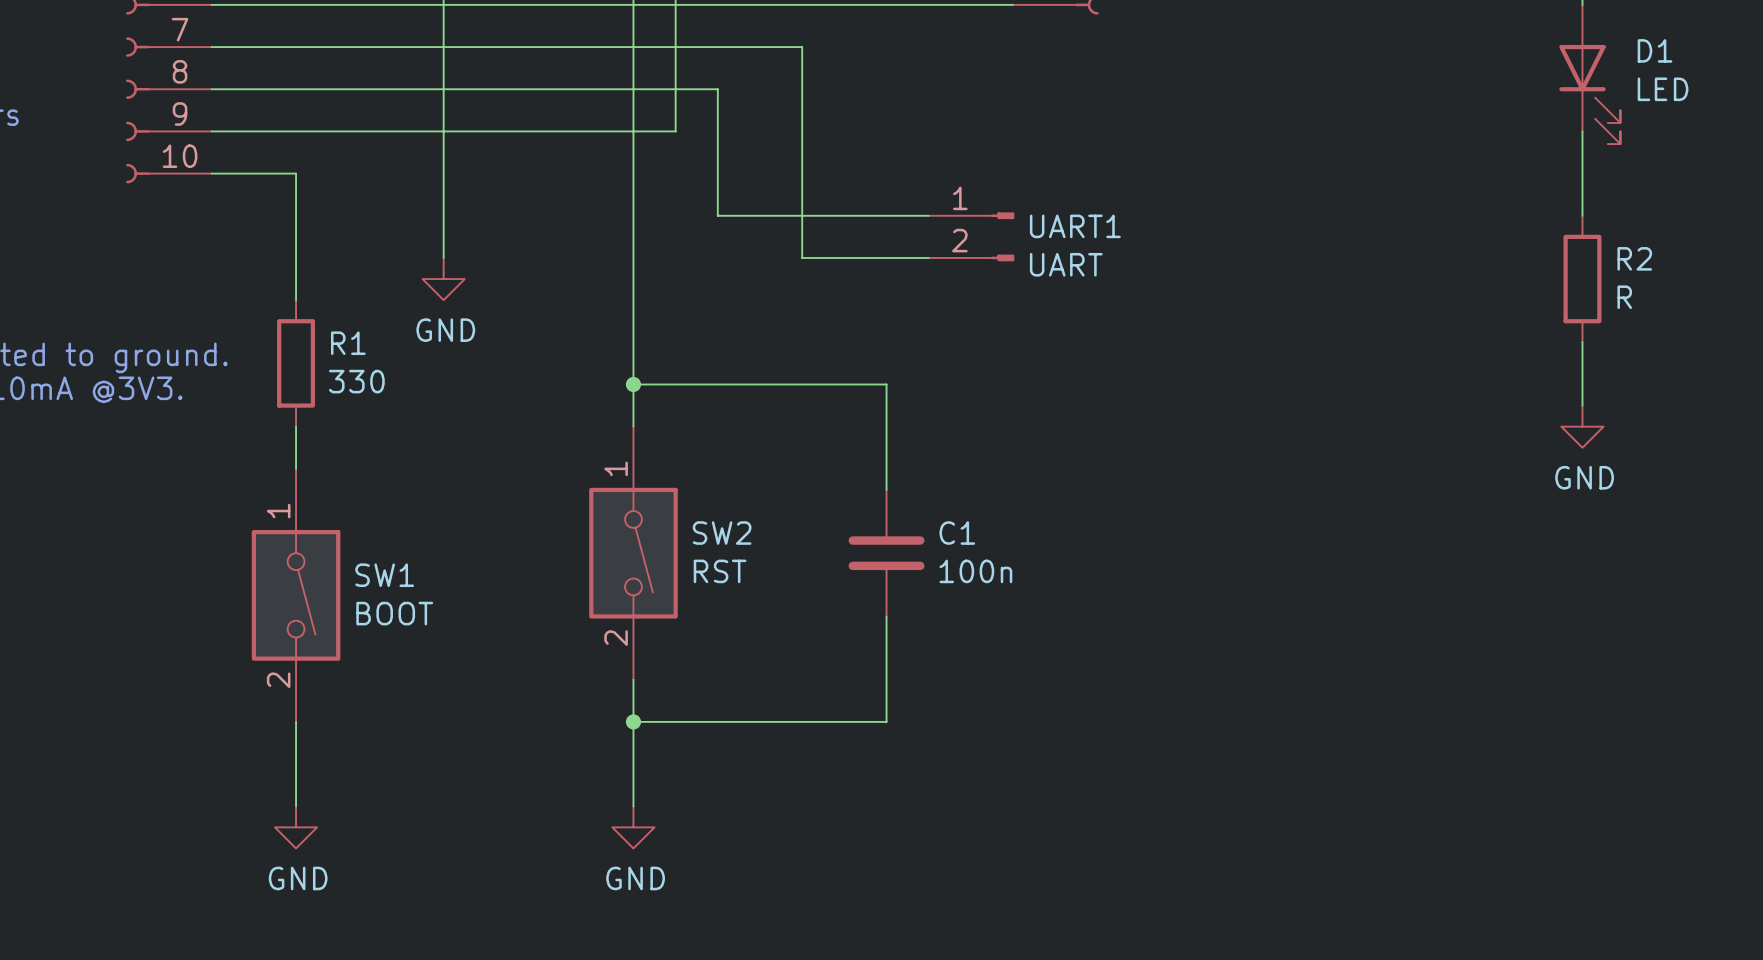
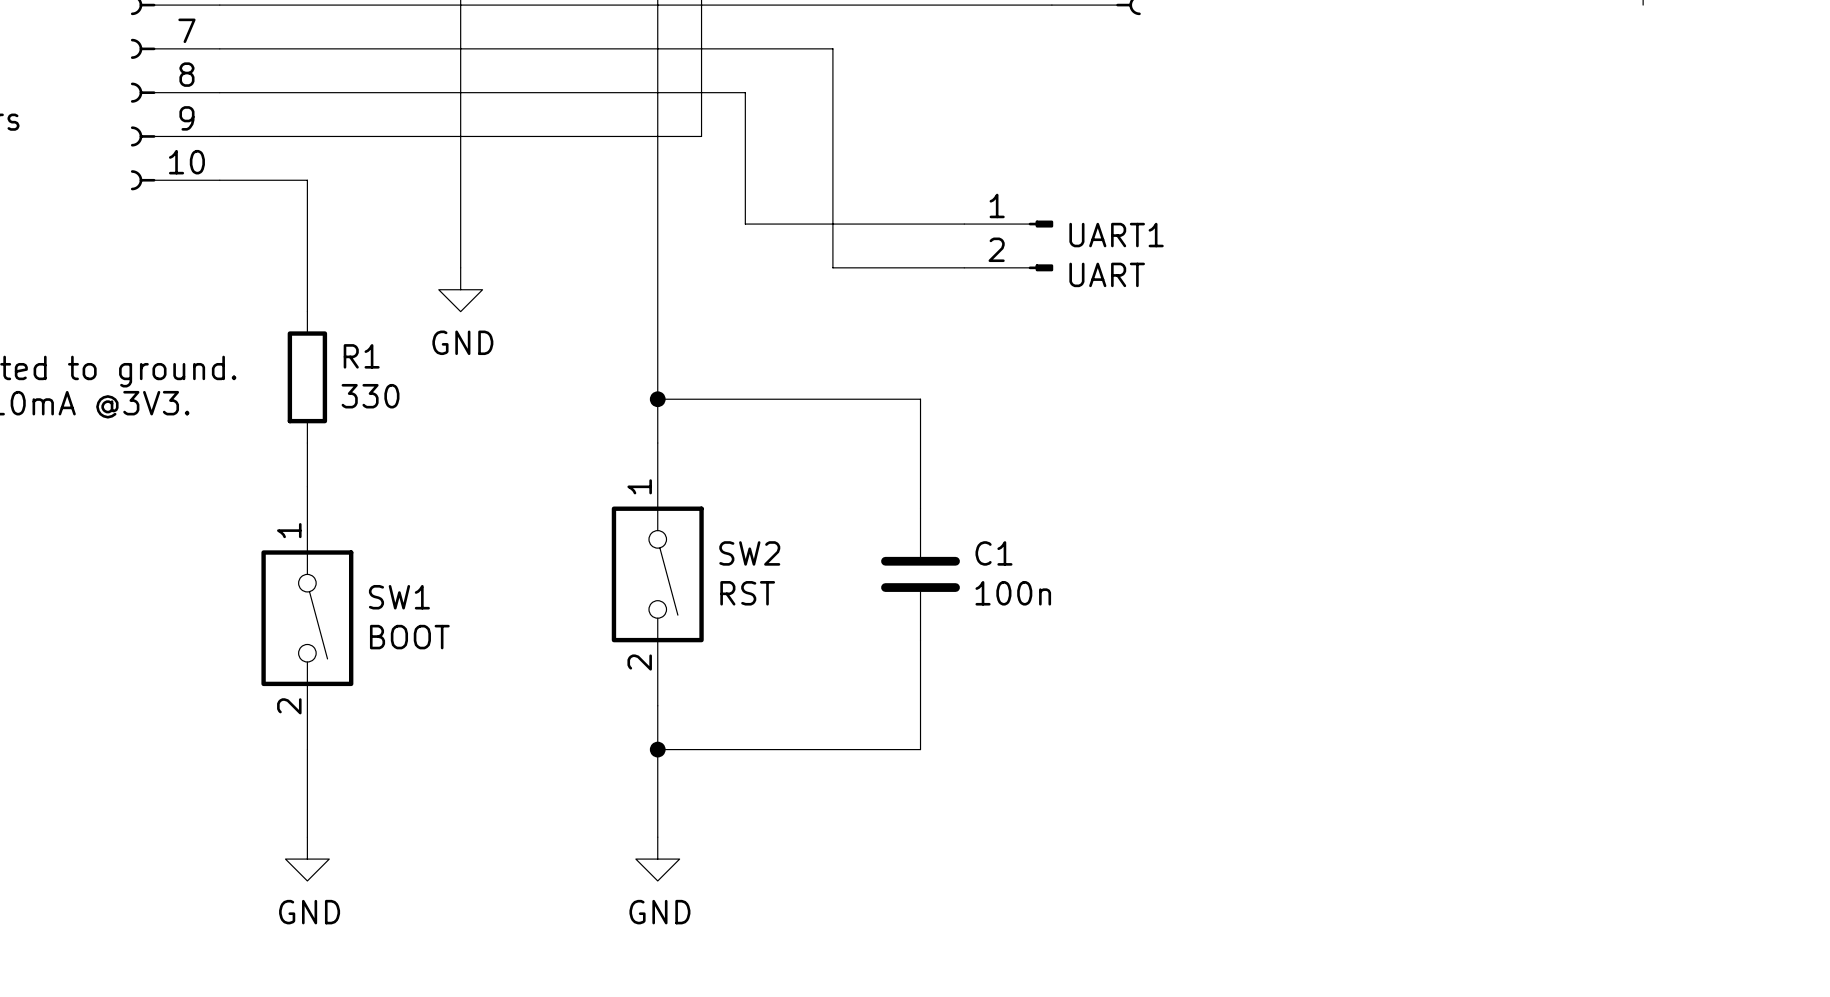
D1: LED (1589, 74) -> none
wire: (1582, 131) (1582, 215) -> none
R2: R (1582, 279) -> none
wire: (1582, 342) (1582, 405) -> none
power symbol: GND (1582, 426) -> none

